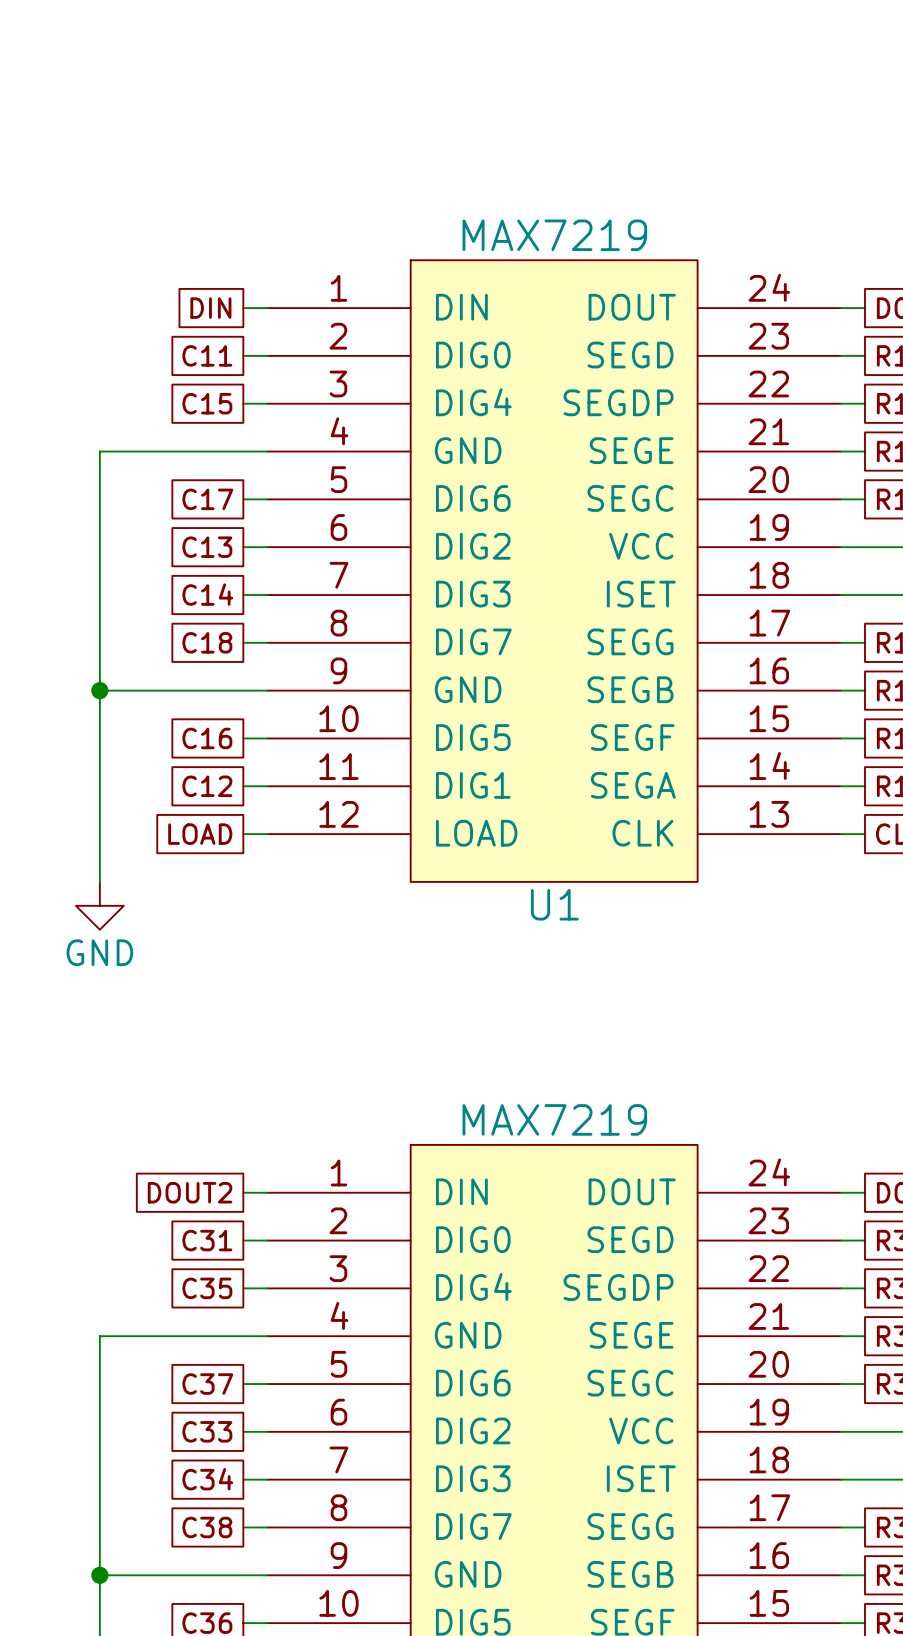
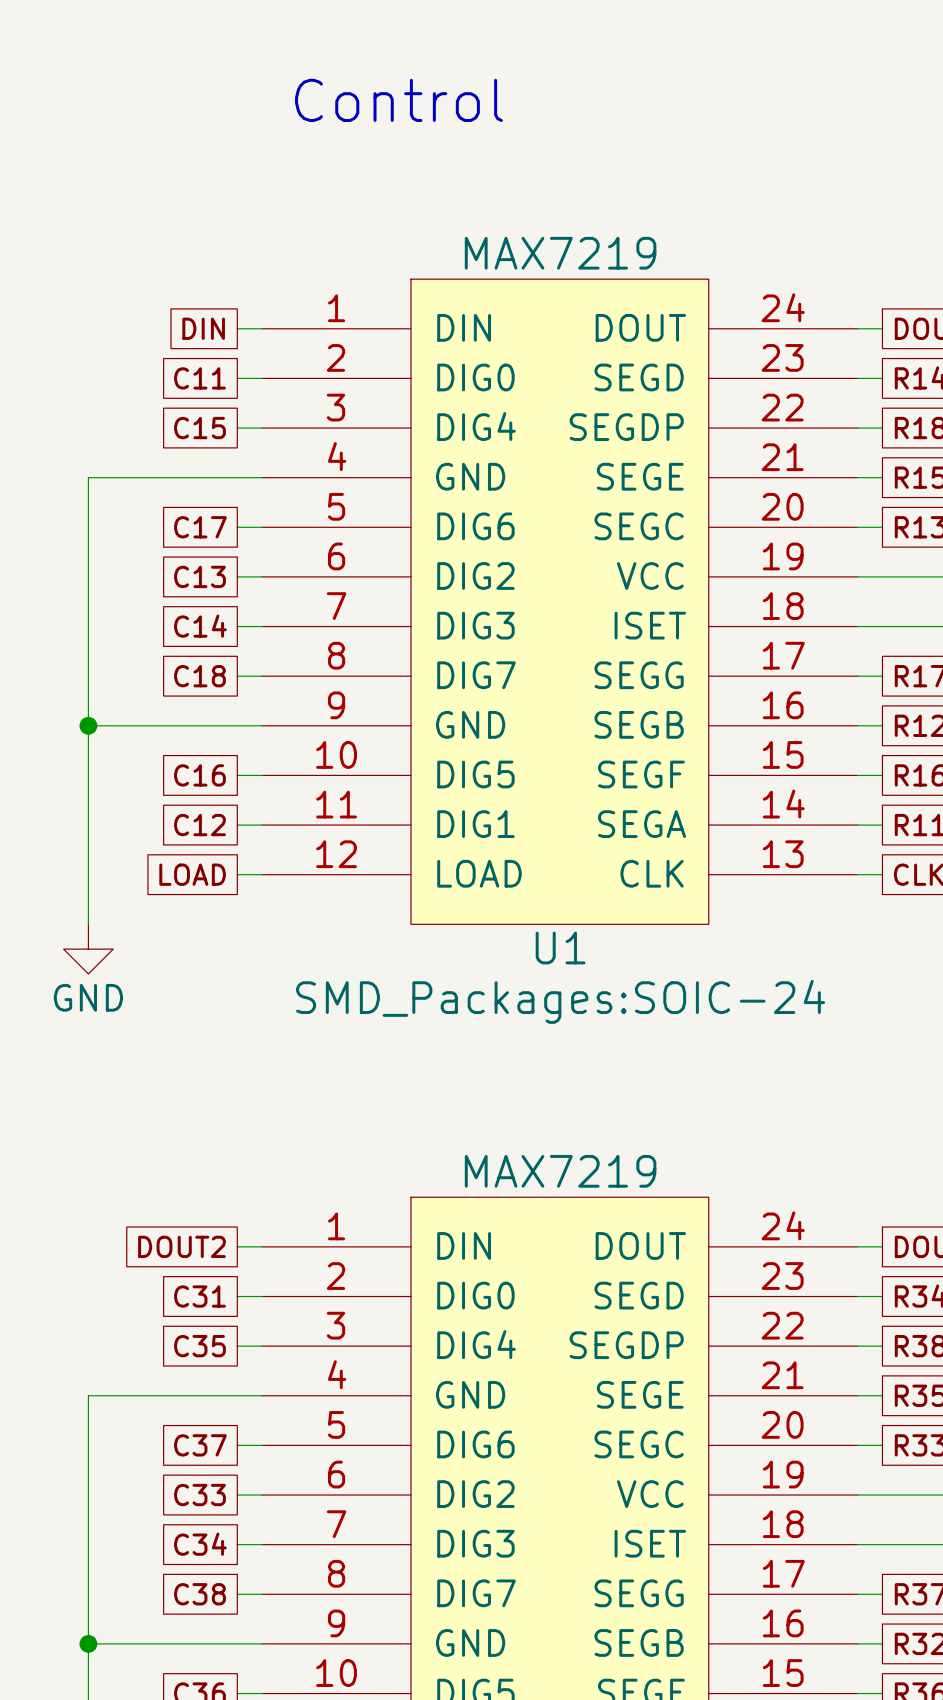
text: none -> Control (398, 100)
U1 text: none -> SMD_Packages:SOIC-24 (560, 1001)

